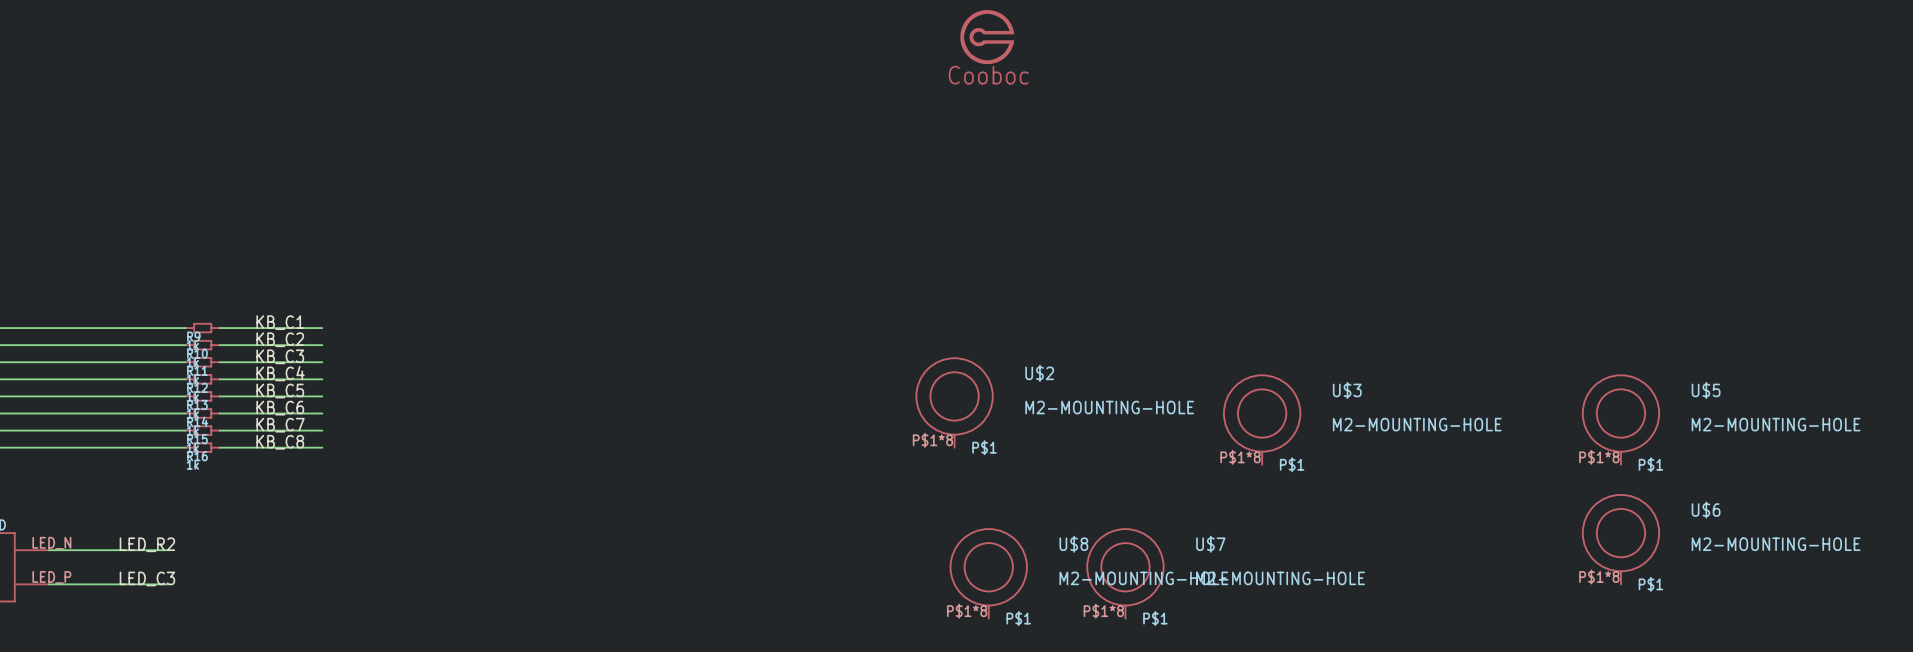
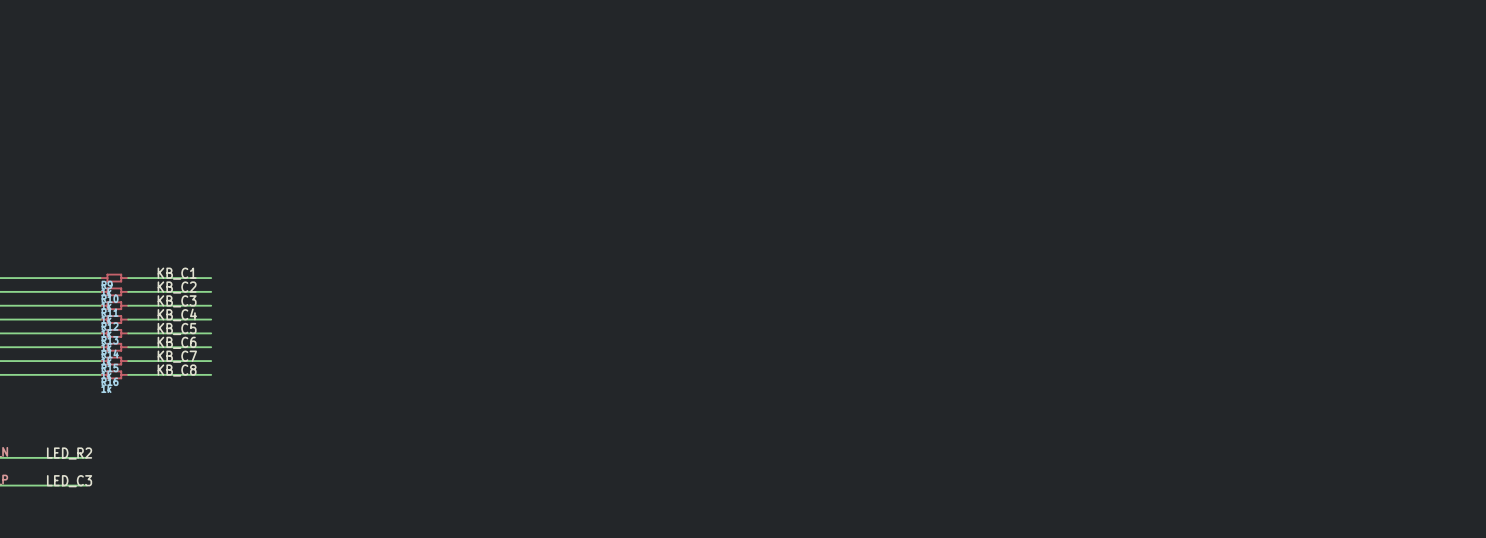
part: (987, 37) -> none
U$2: M2-MOUNTING-HOLE (954, 402) -> none
U$3: M2-MOUNTING-HOLE (1262, 420) -> none
U$5: M2-MOUNTING-HOLE (1620, 420) -> none
U$6: M2-MOUNTING-HOLE (1620, 539) -> none
U$8: M2-MOUNTING-HOLE (988, 573) -> none
U$7: M2-MOUNTING-HOLE (1125, 573) -> none

